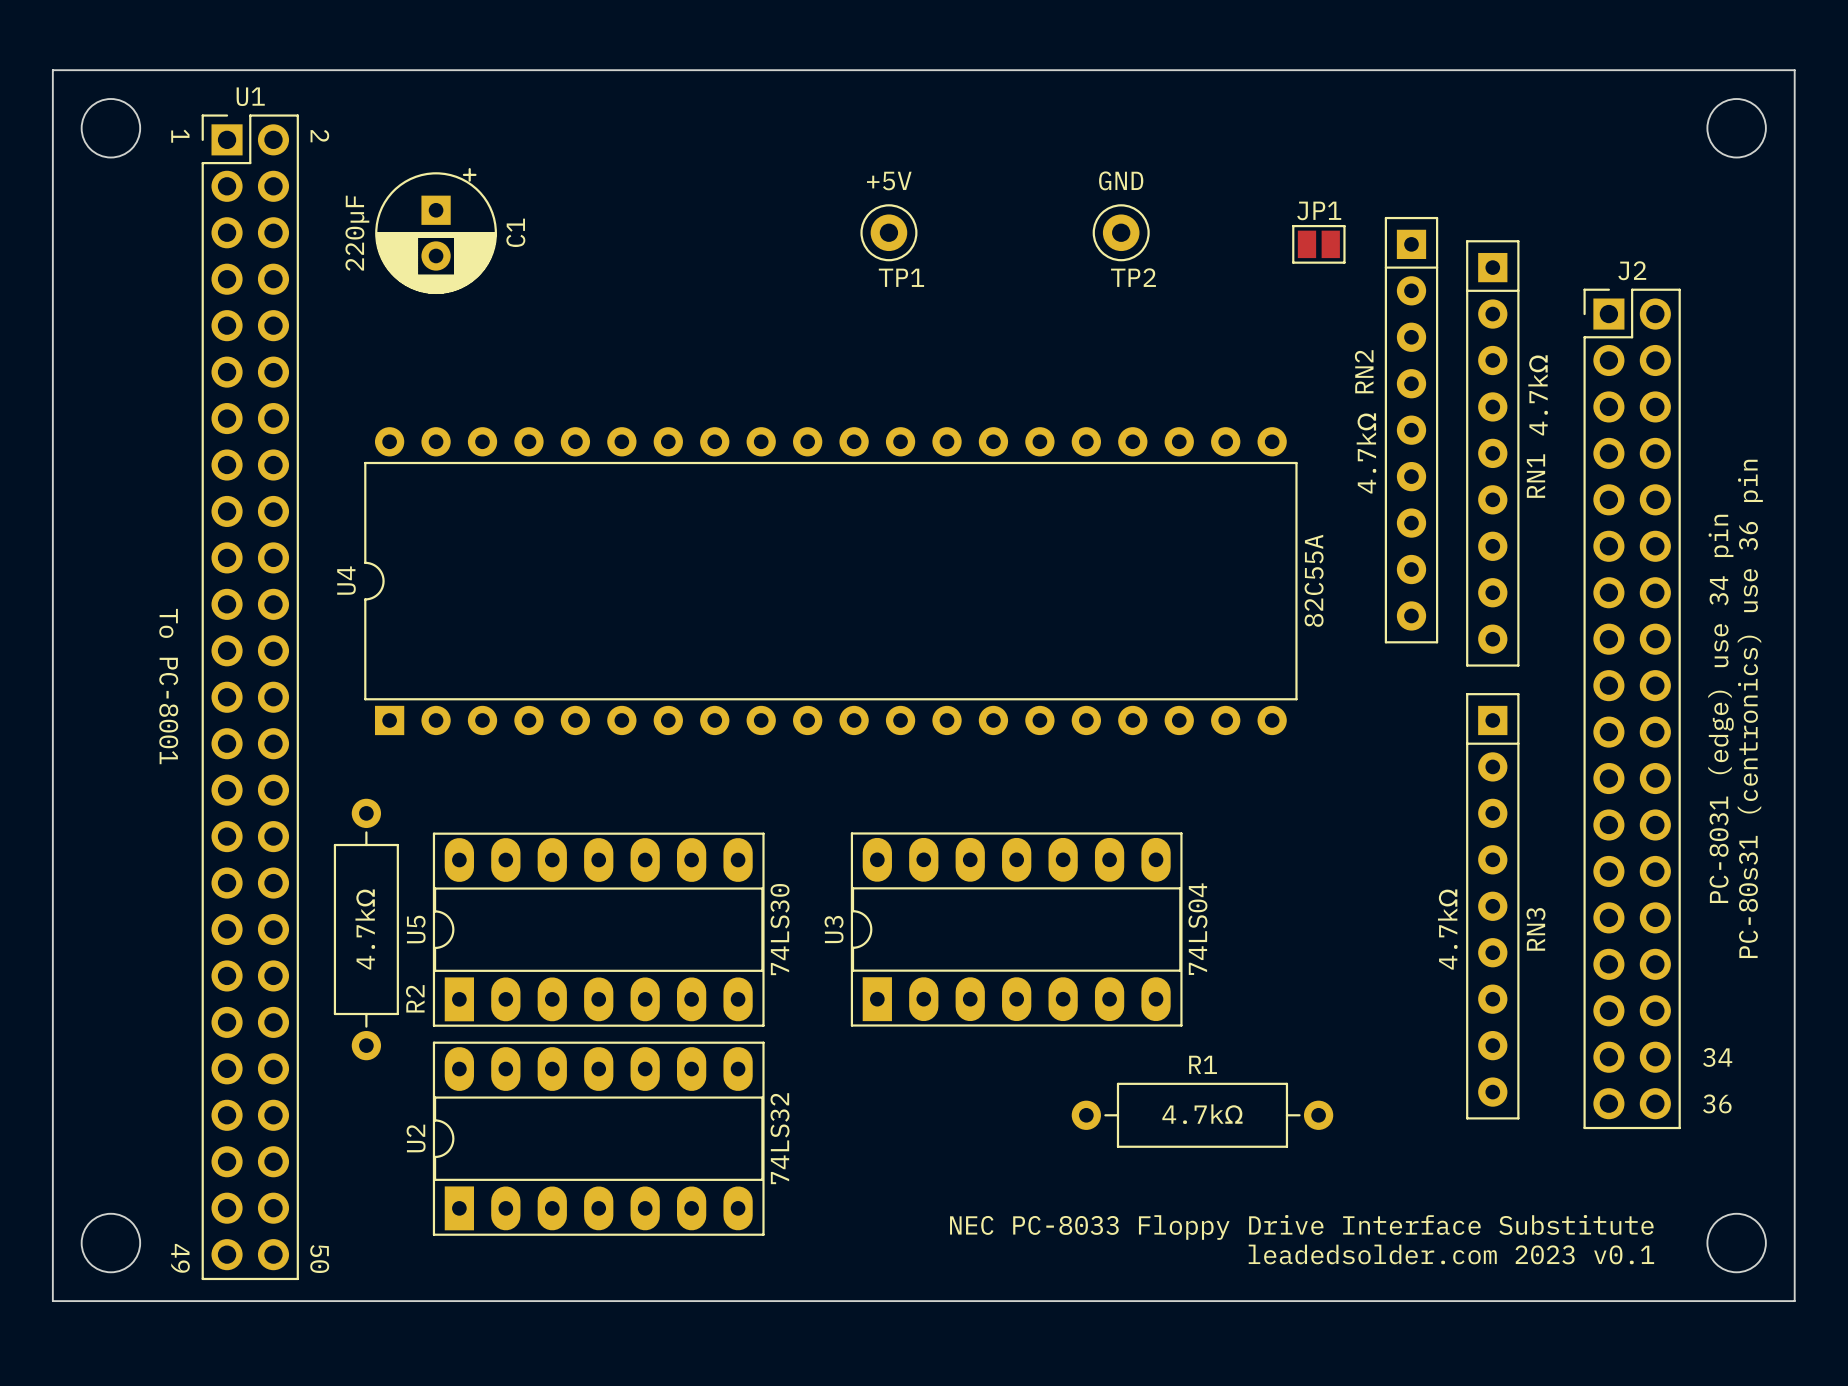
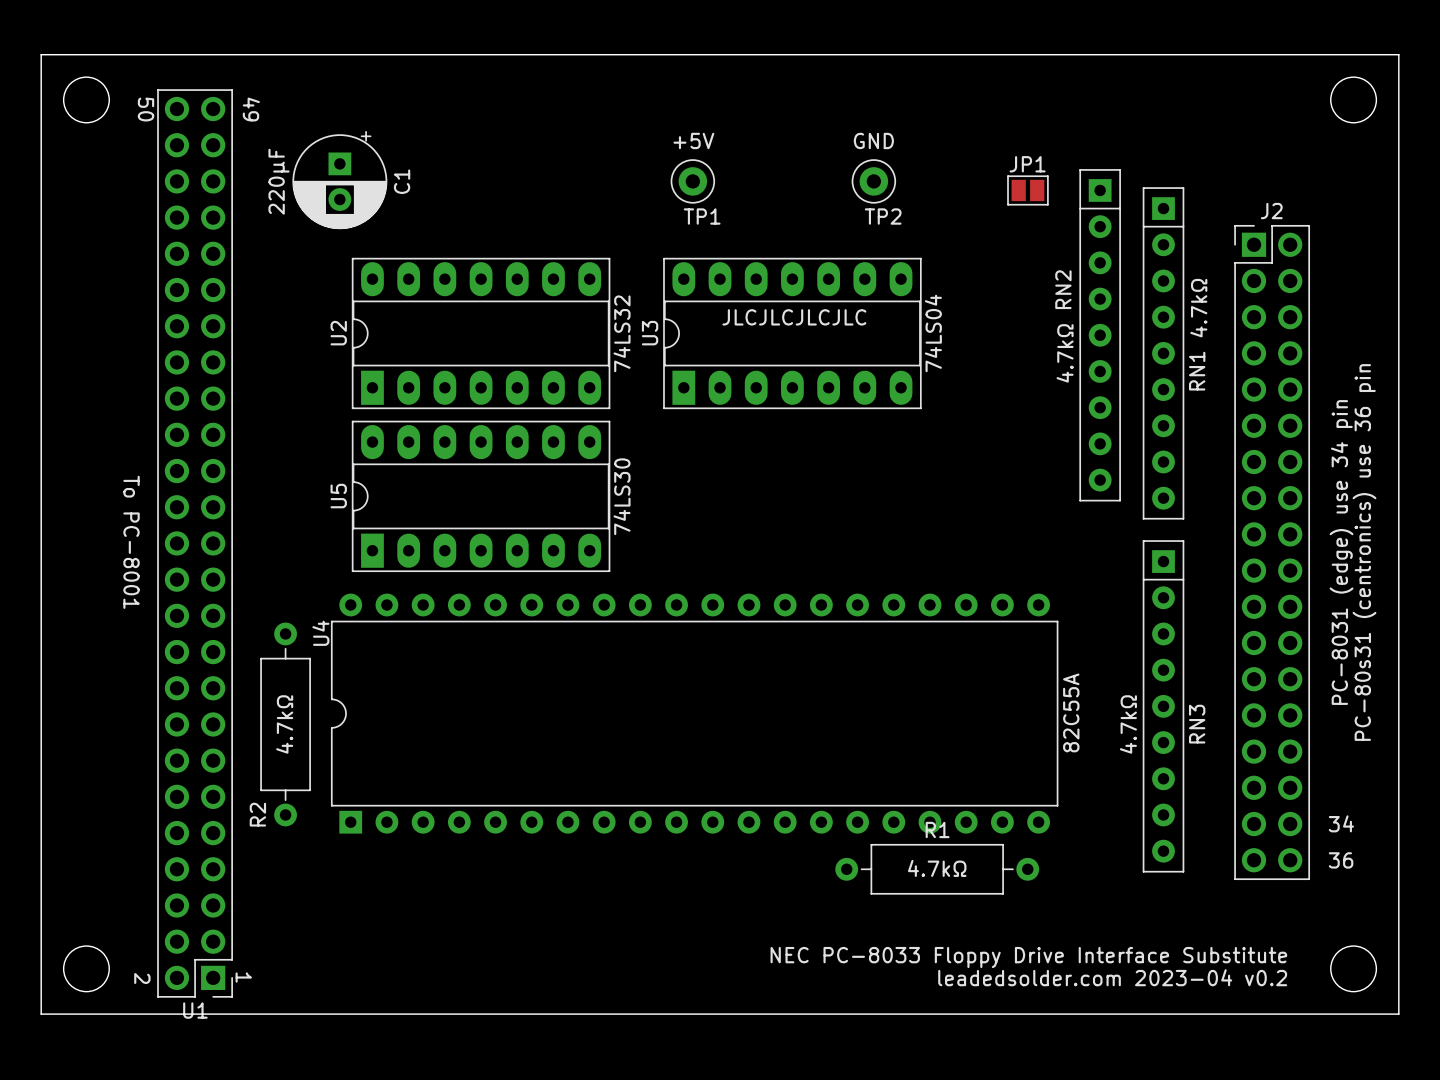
text: 1 (180, 136) -> 50 (146, 109)
text: 2 (319, 136) -> 49 (251, 109)
text: none -> JLCJLCJLCJLC (794, 317)
U4 name position: U4 (346, 580) -> U4 (320, 633)
U4 position: (830, 581) -> (694, 713)
U1 rotation: 0° (250, 697) -> 180° (195, 543)
U5 position: (598, 929) -> (481, 496)
U3 position: (1016, 929) -> (792, 333)
R2 name position: R2 (415, 998) -> R2 (257, 814)
U2 position: (598, 1138) -> (481, 333)
text: leadedsolder.com 2023 v0.1 (1451, 1254) -> leadedsolder.com 2023-04 v0.2 (1112, 977)
text: 49 (180, 1258) -> 2 (142, 978)
text: 50 (319, 1258) -> 1 (243, 977)

